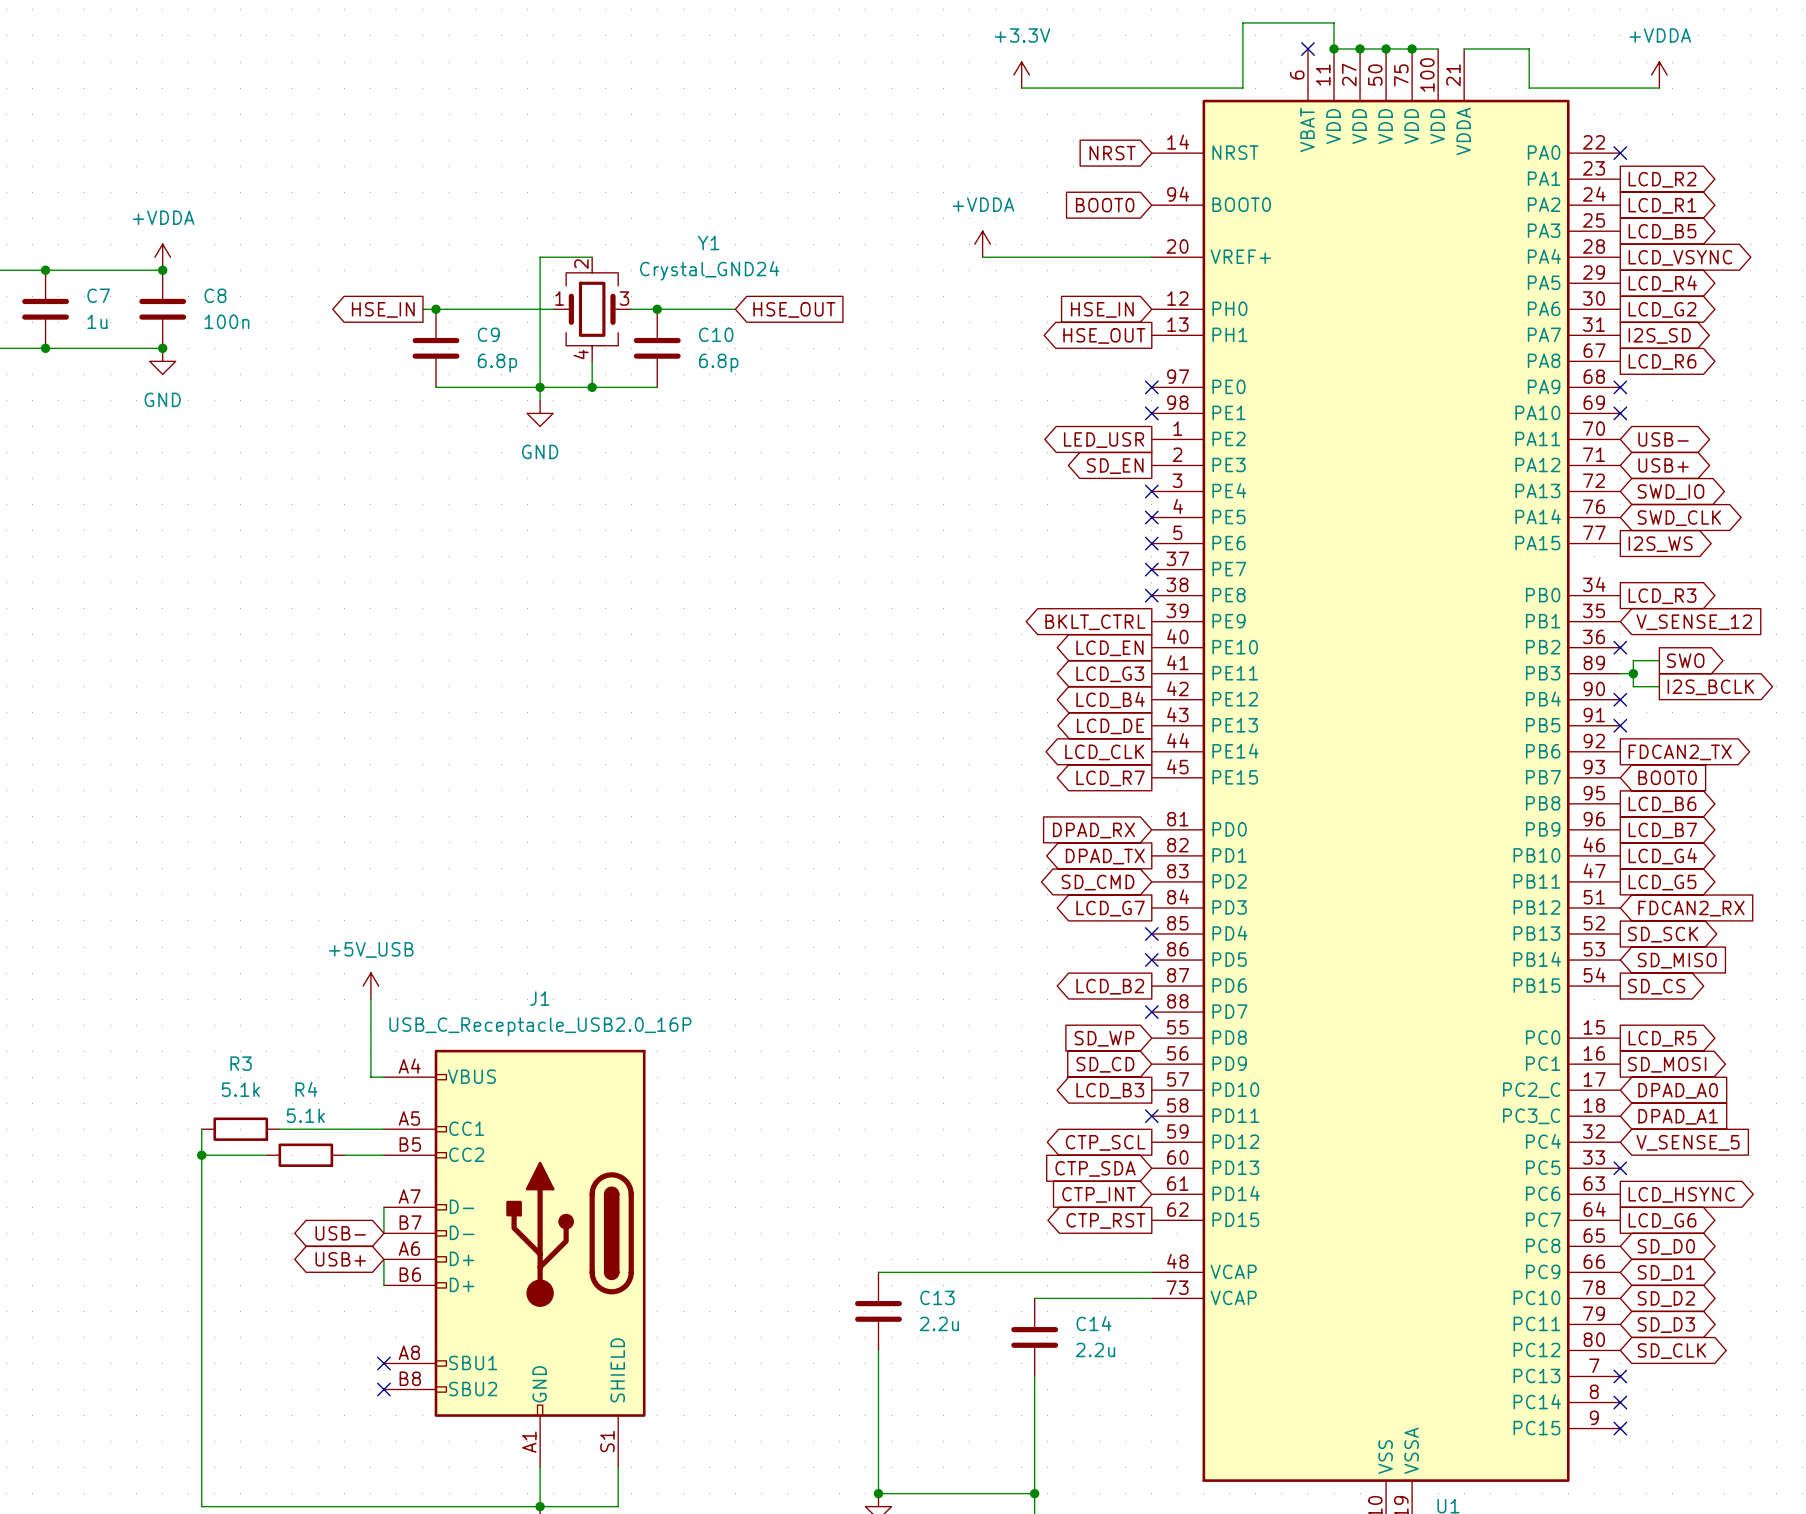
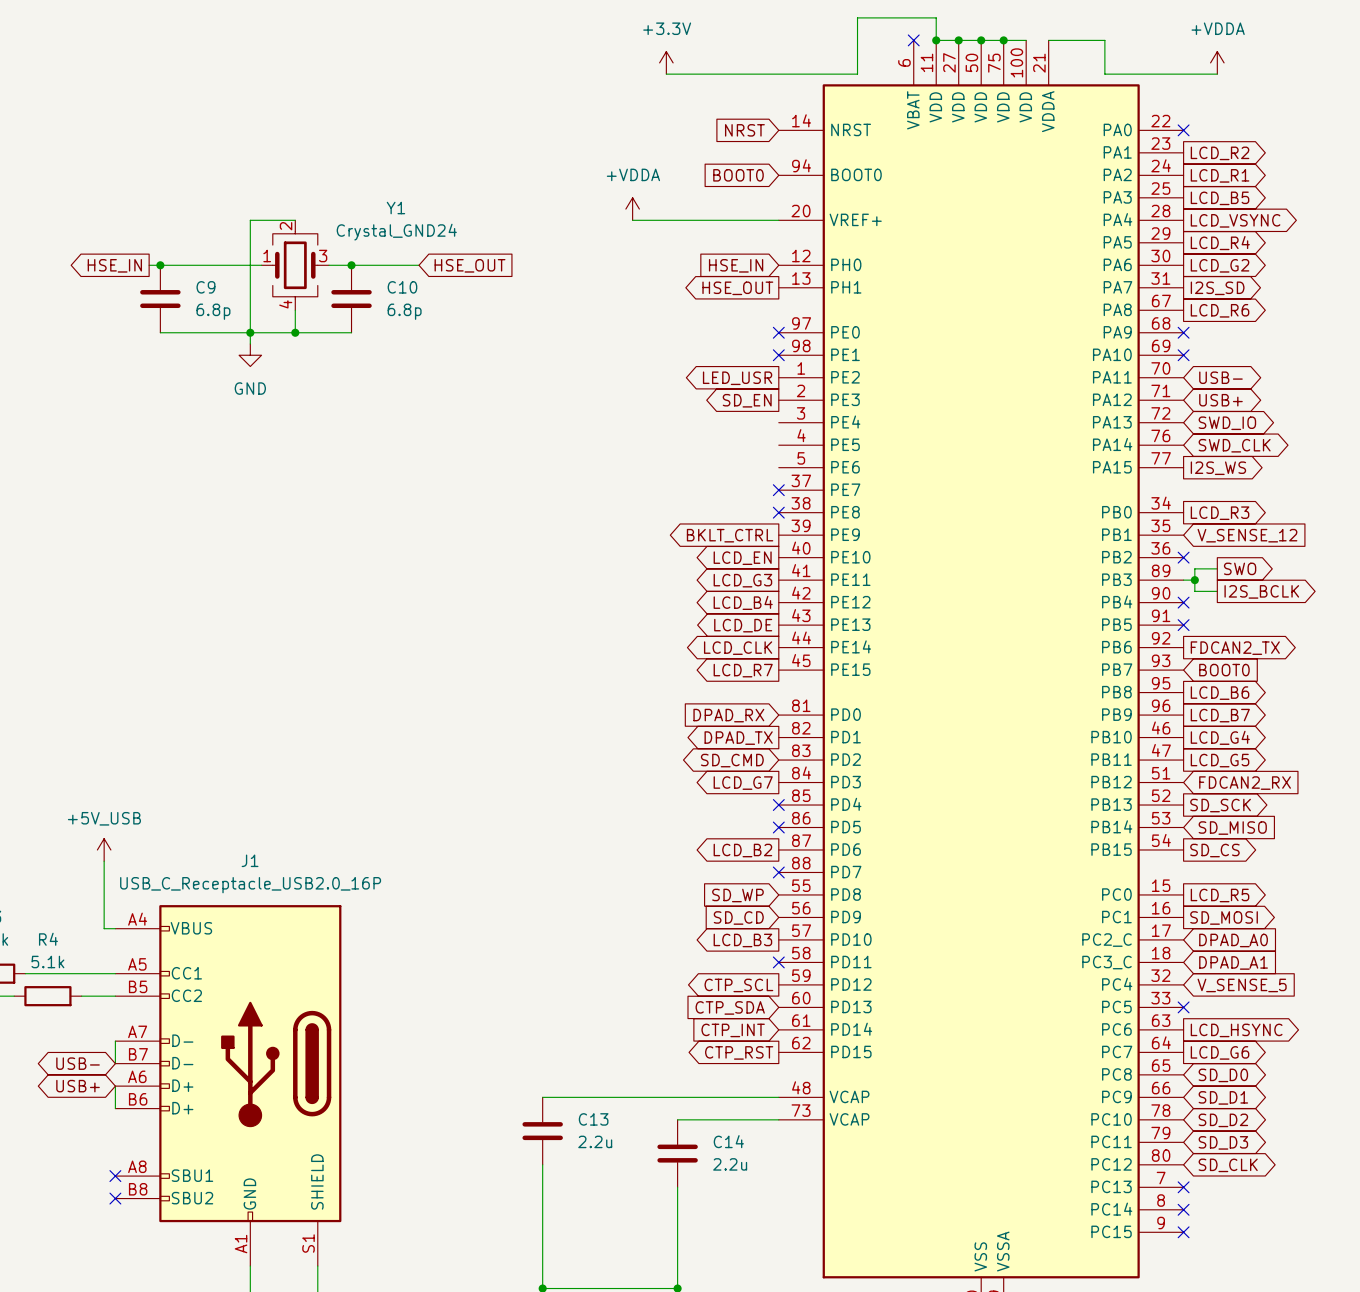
no-connect mark: (1151, 491) -> none
no-connect mark: (1151, 517) -> none
no-connect mark: (1151, 543) -> none

